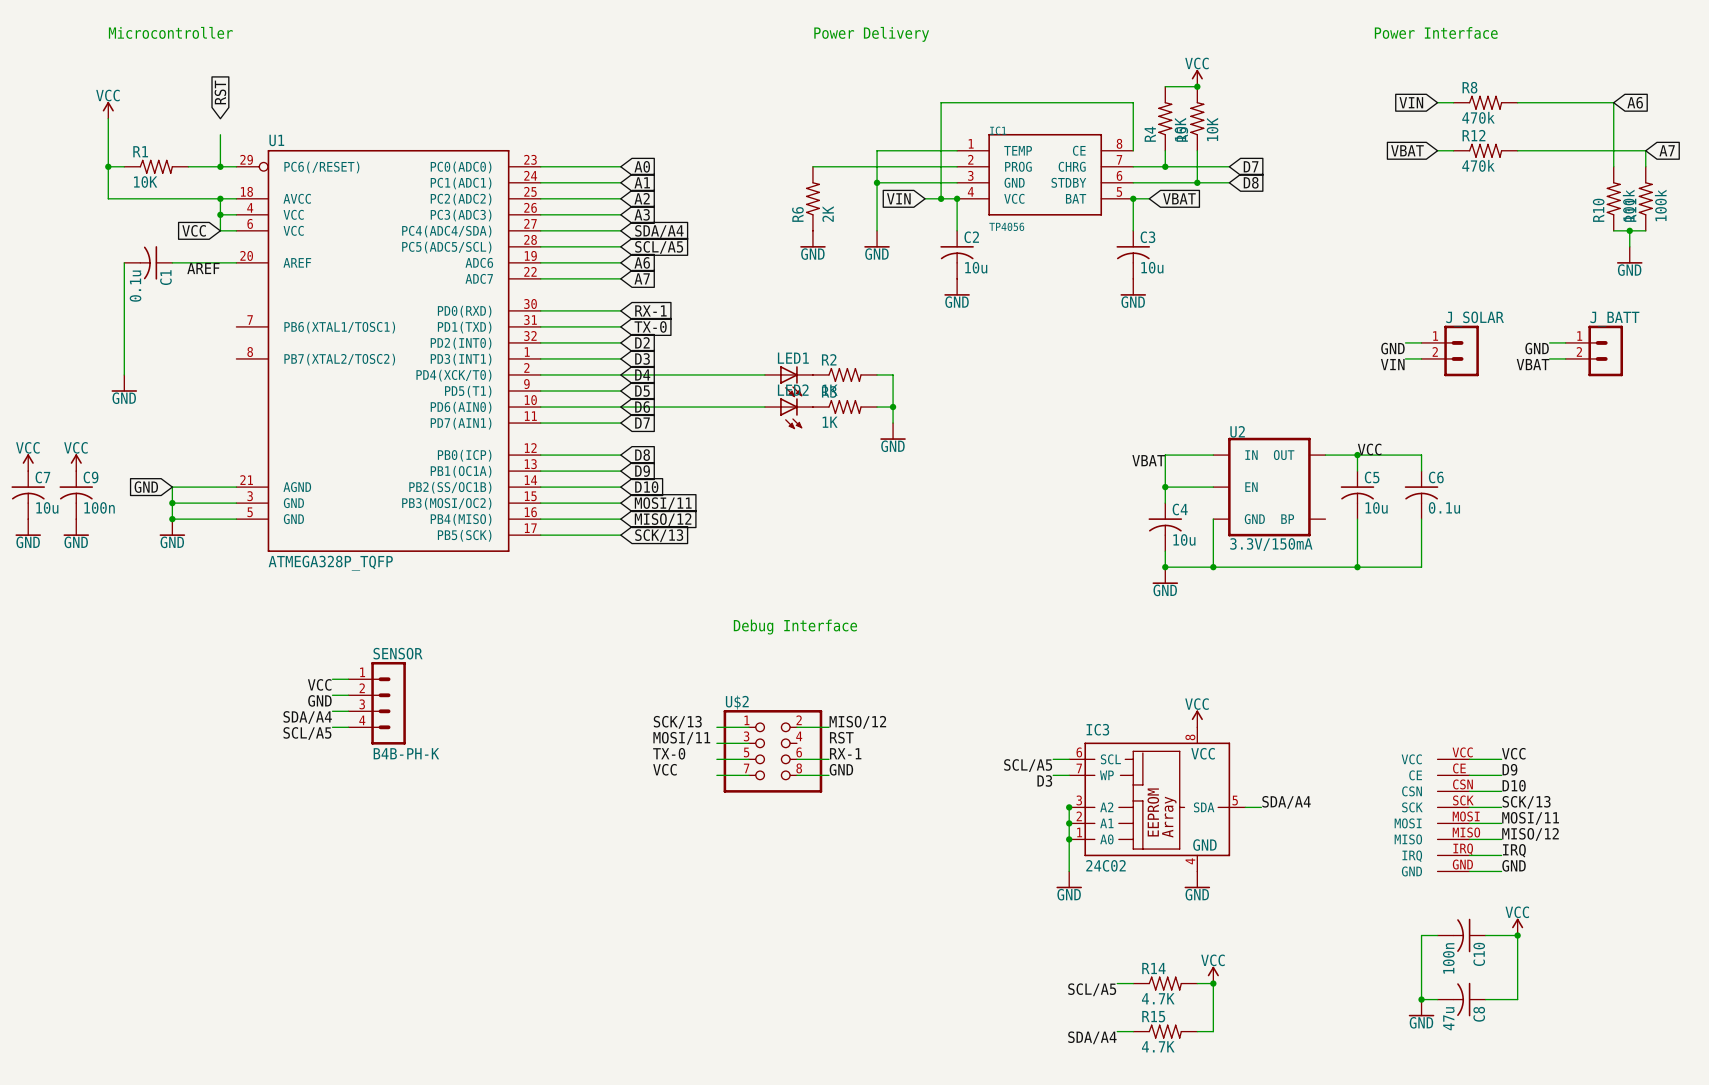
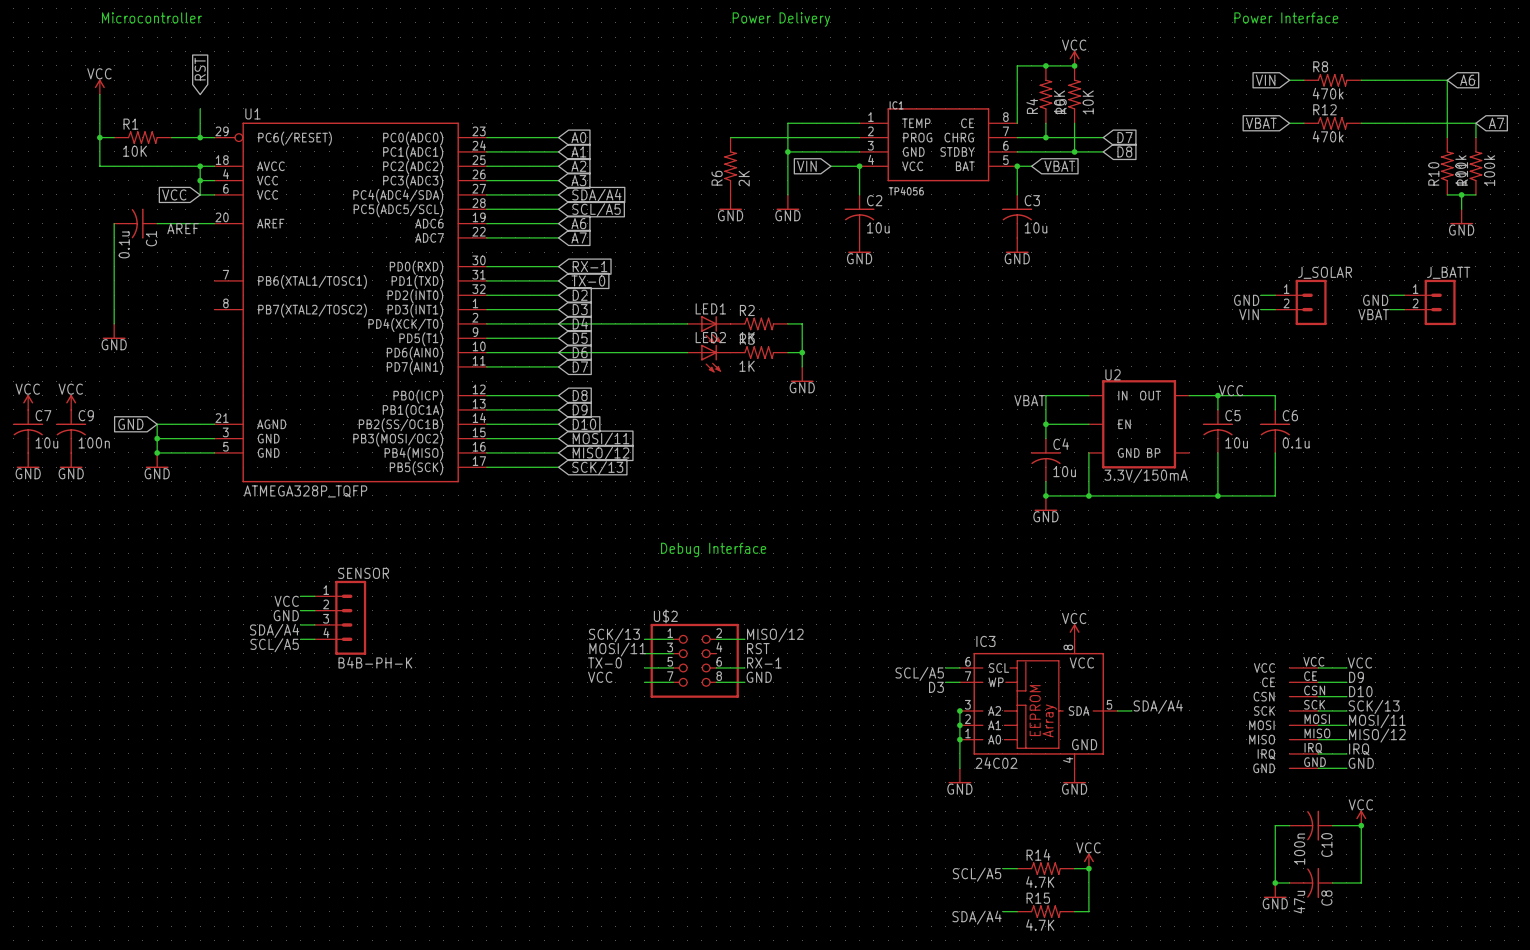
junction: none -> (1045, 65)
wire: (1133, 102) (941, 102) (941, 198) -> (1017, 80) (1017, 65) (1045, 65)
junction: (941, 198) -> none

